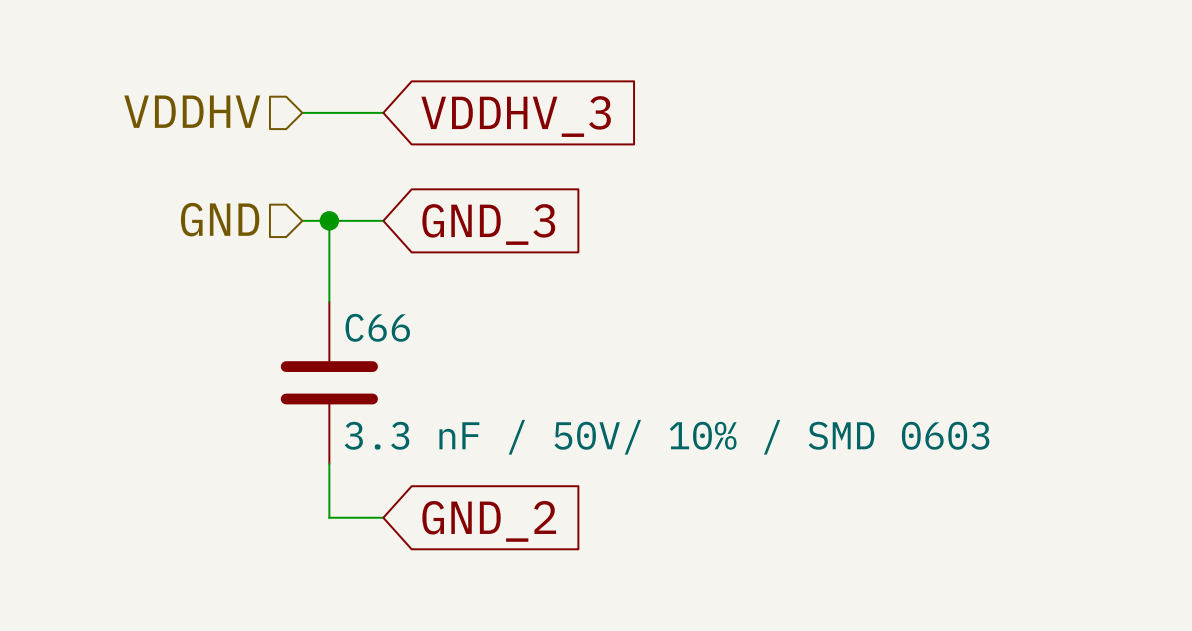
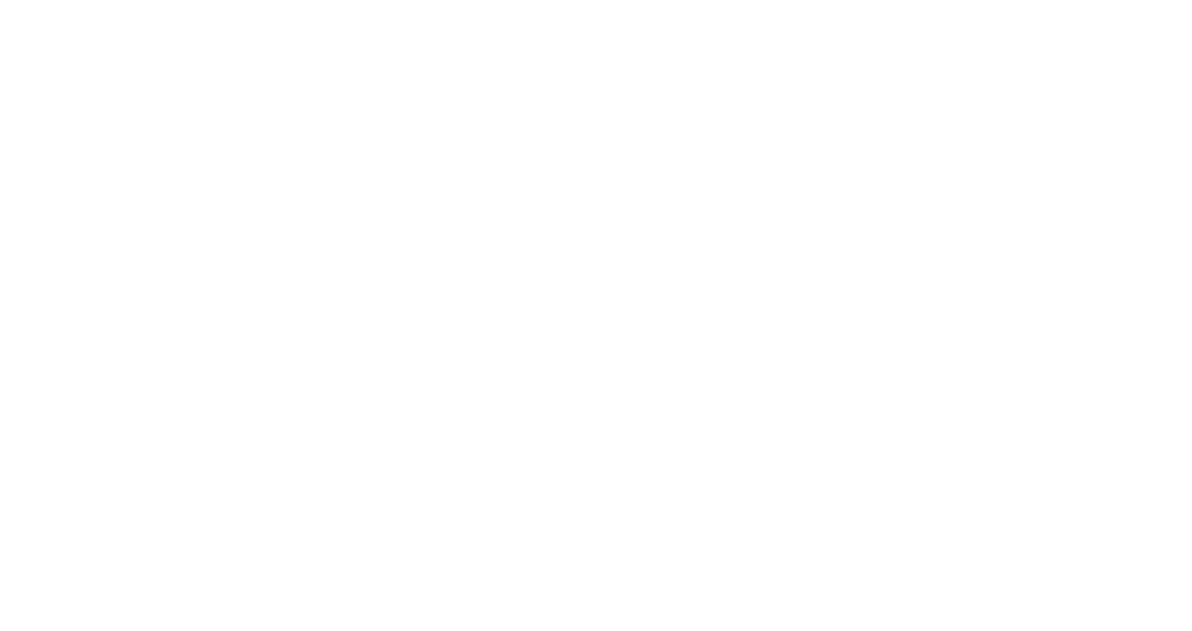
hierarchical label: VDDHV (192, 111) -> none
wire: (302, 112) (383, 112) -> none
global label: VDDHV_3 (516, 116) -> none
hierarchical label: GND (220, 219) -> none
wire: (302, 220) (383, 220) -> none
wire: (329, 220) (329, 301) -> none
junction: (329, 220) -> none
global label: GND_3 (488, 224) -> none
C66: 3.3 nF / 50V/ 10% / SMD 0603 (329, 382) -> none
wire: (329, 463) (329, 517) (383, 517) -> none
global label: GND_2 (489, 521) -> none

